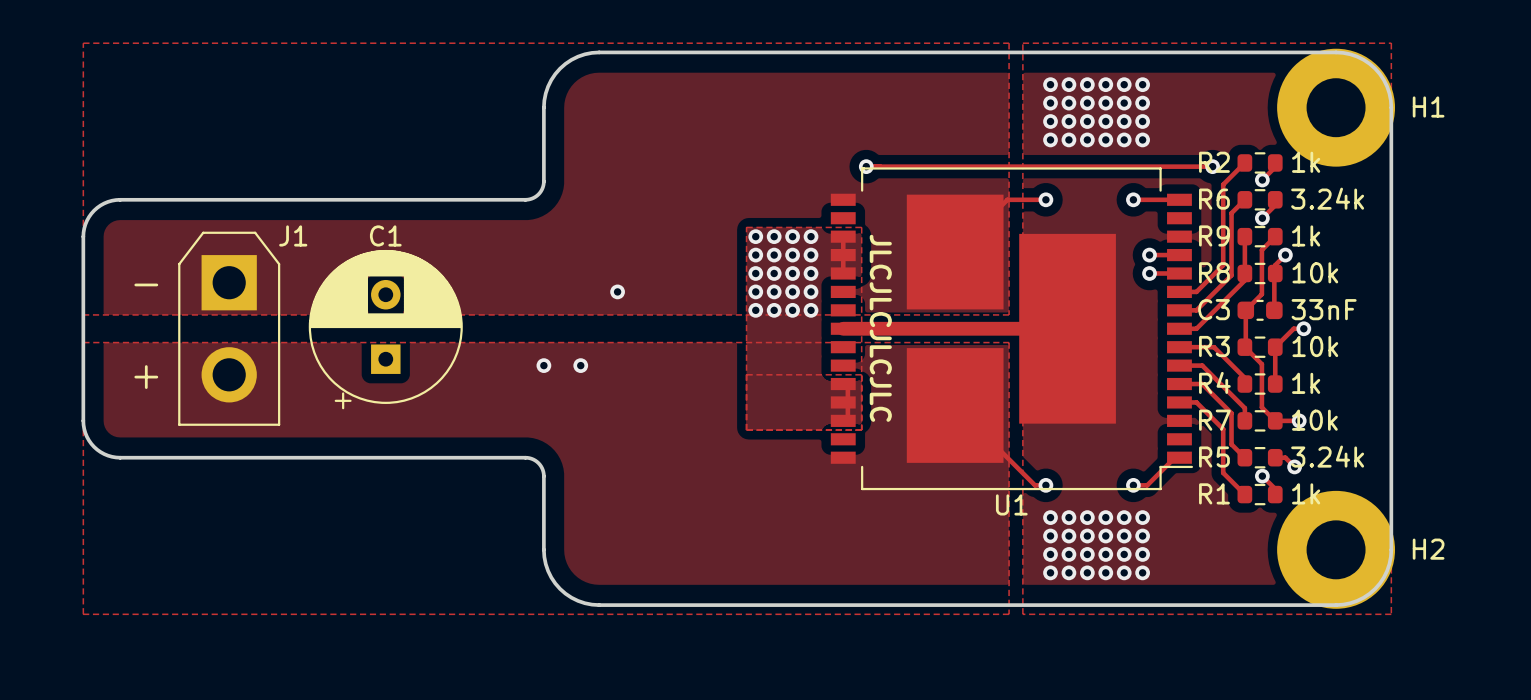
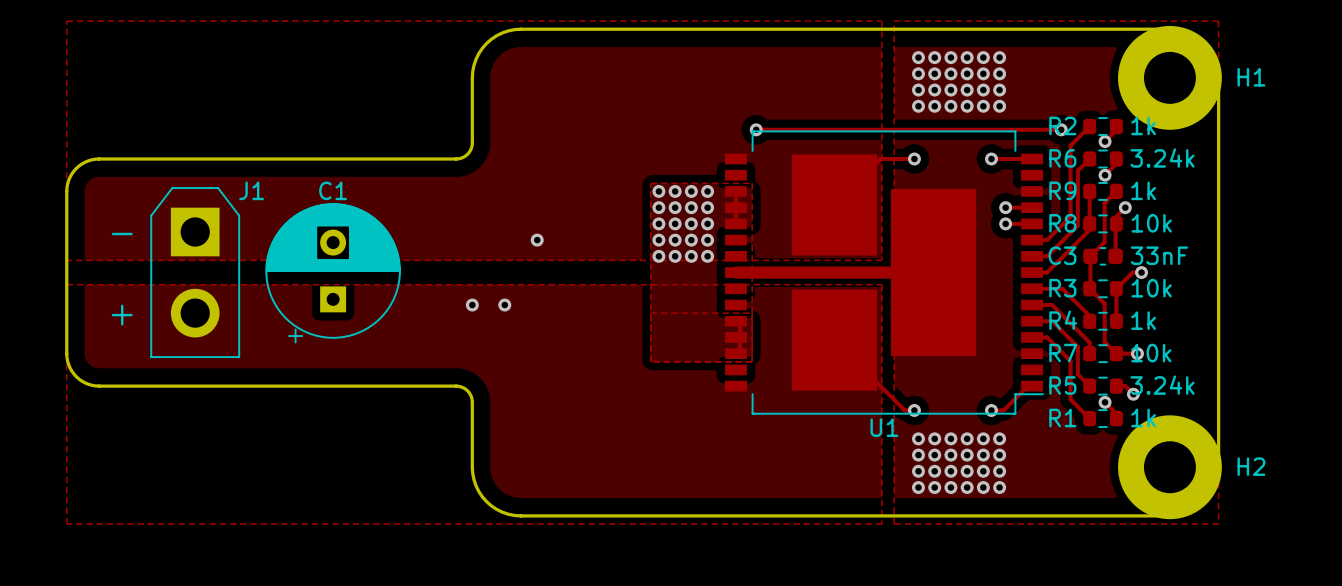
text: JLCJLCJLCJLC (880, 328) -> none

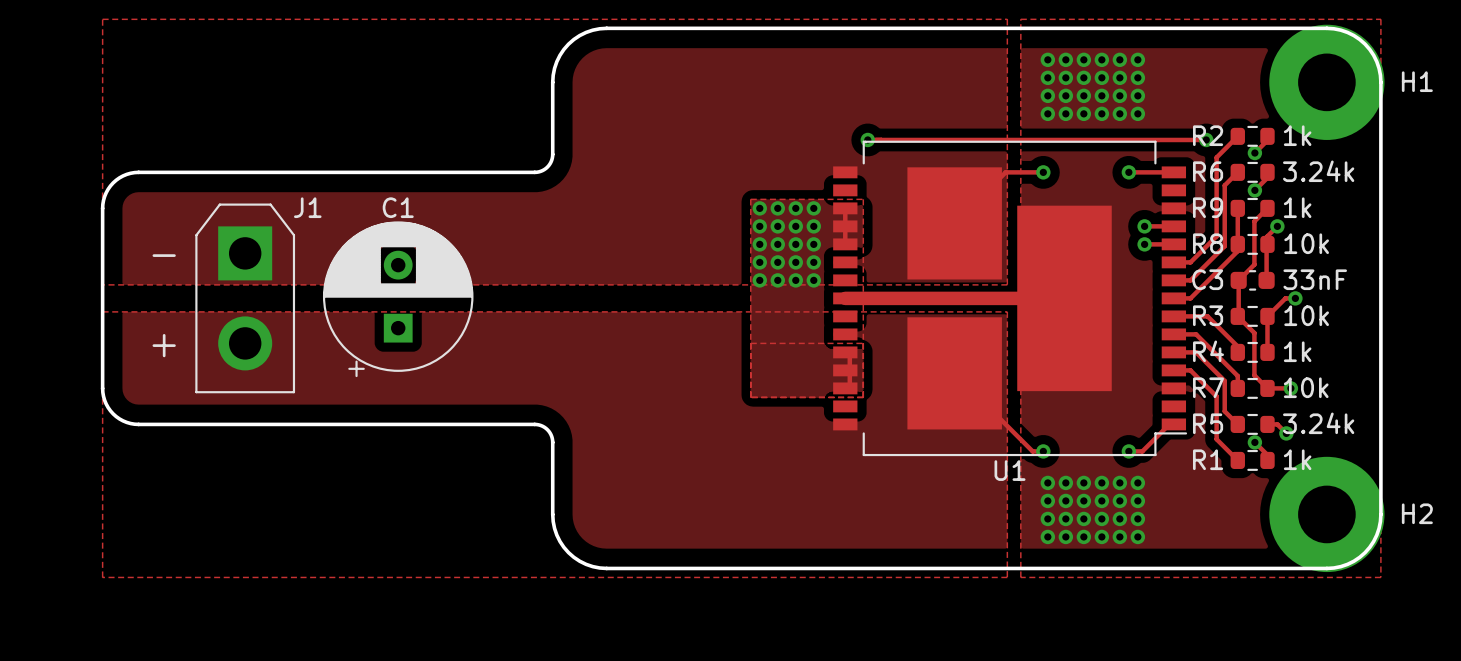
via: (537, 240) -> none
via: (472, 305) -> none
via: (504, 305) -> none

